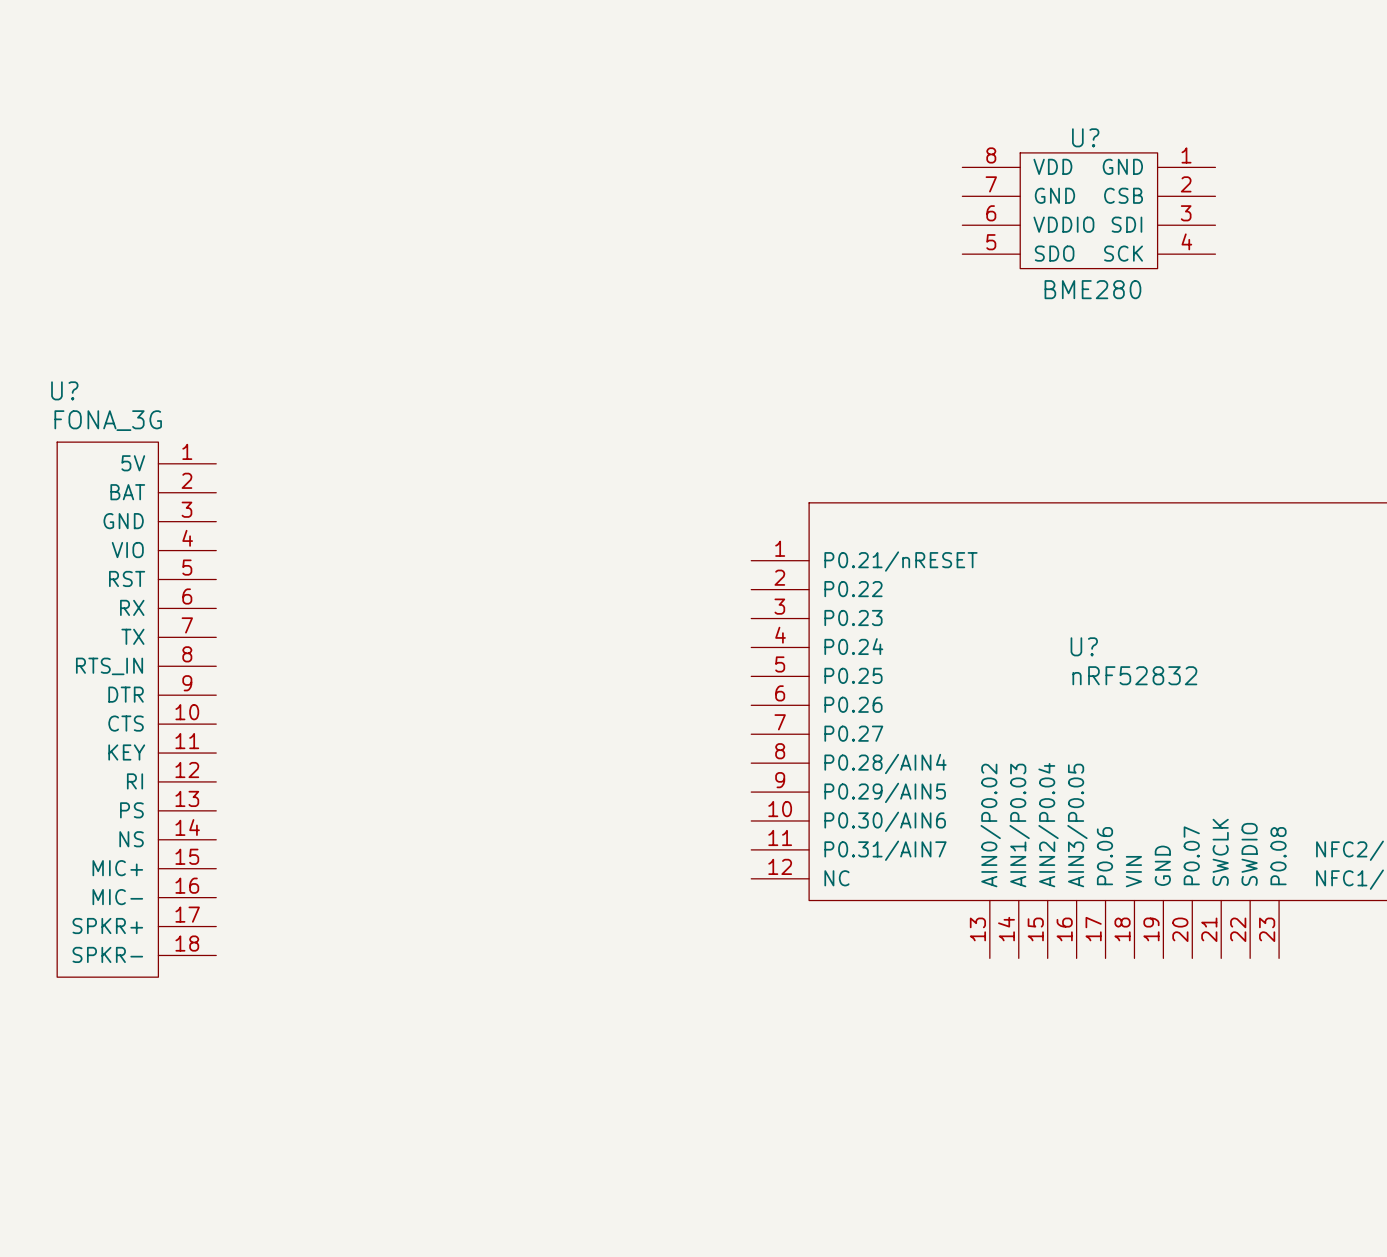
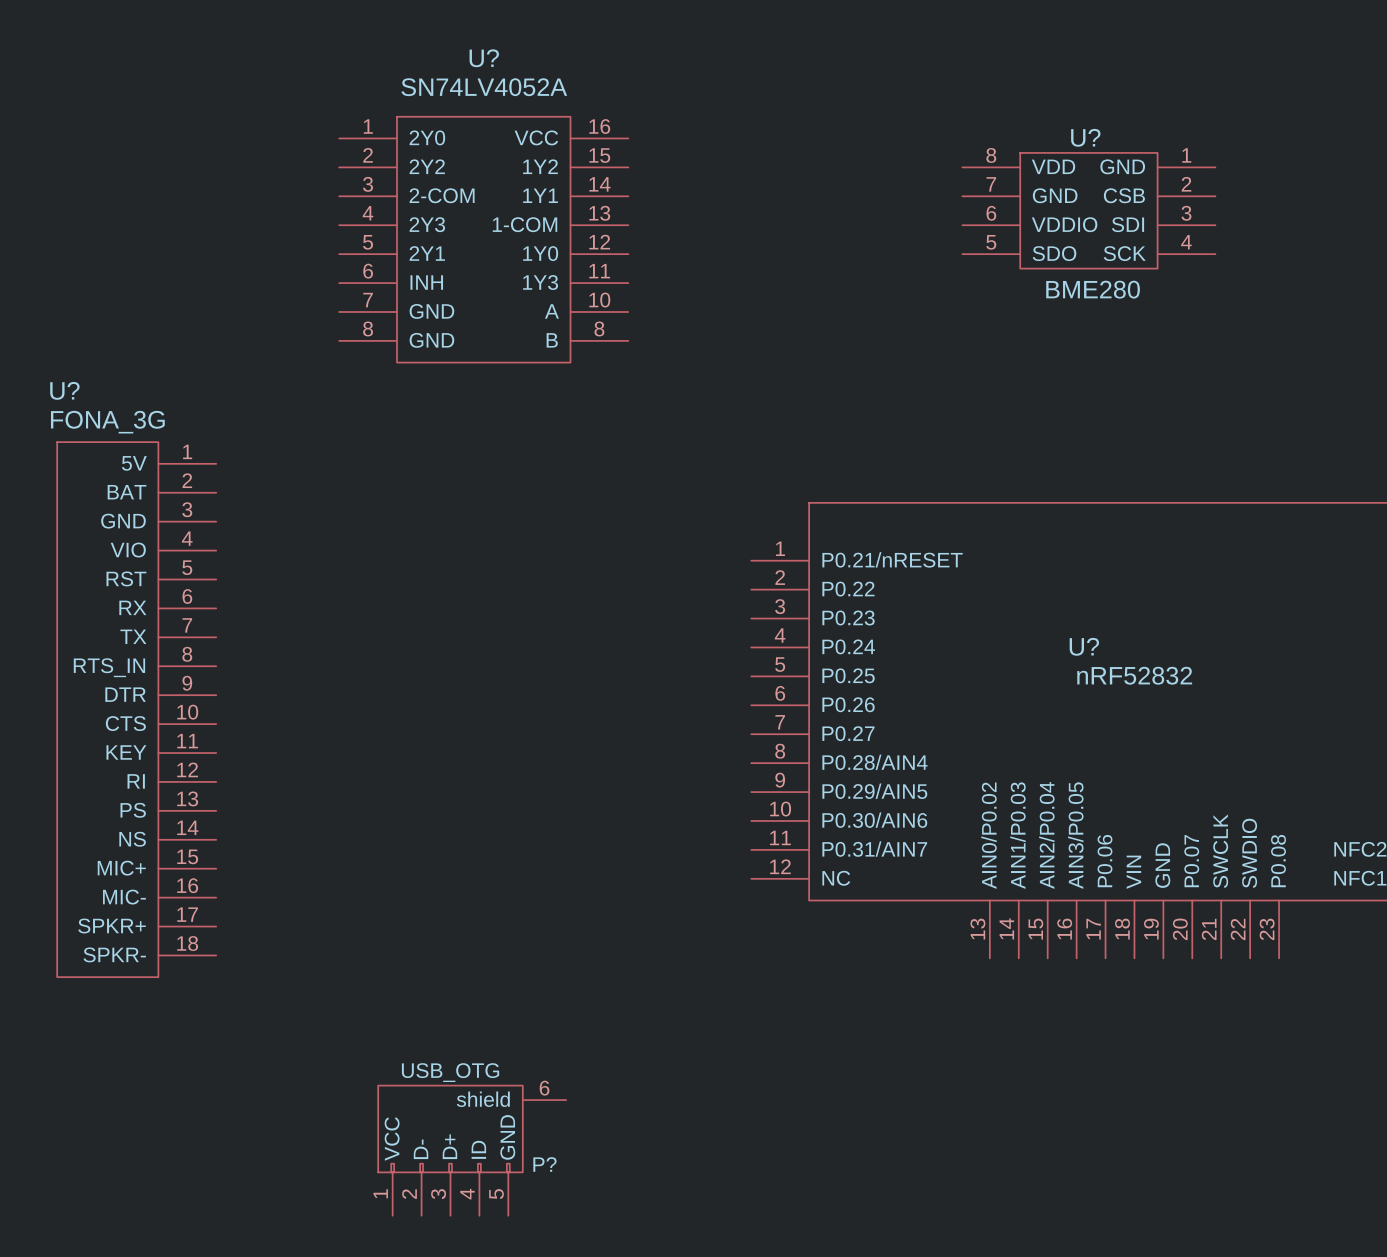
U?: none -> SN74LV4052A (483, 239)
P?: none -> USB_OTG (472, 1150)

